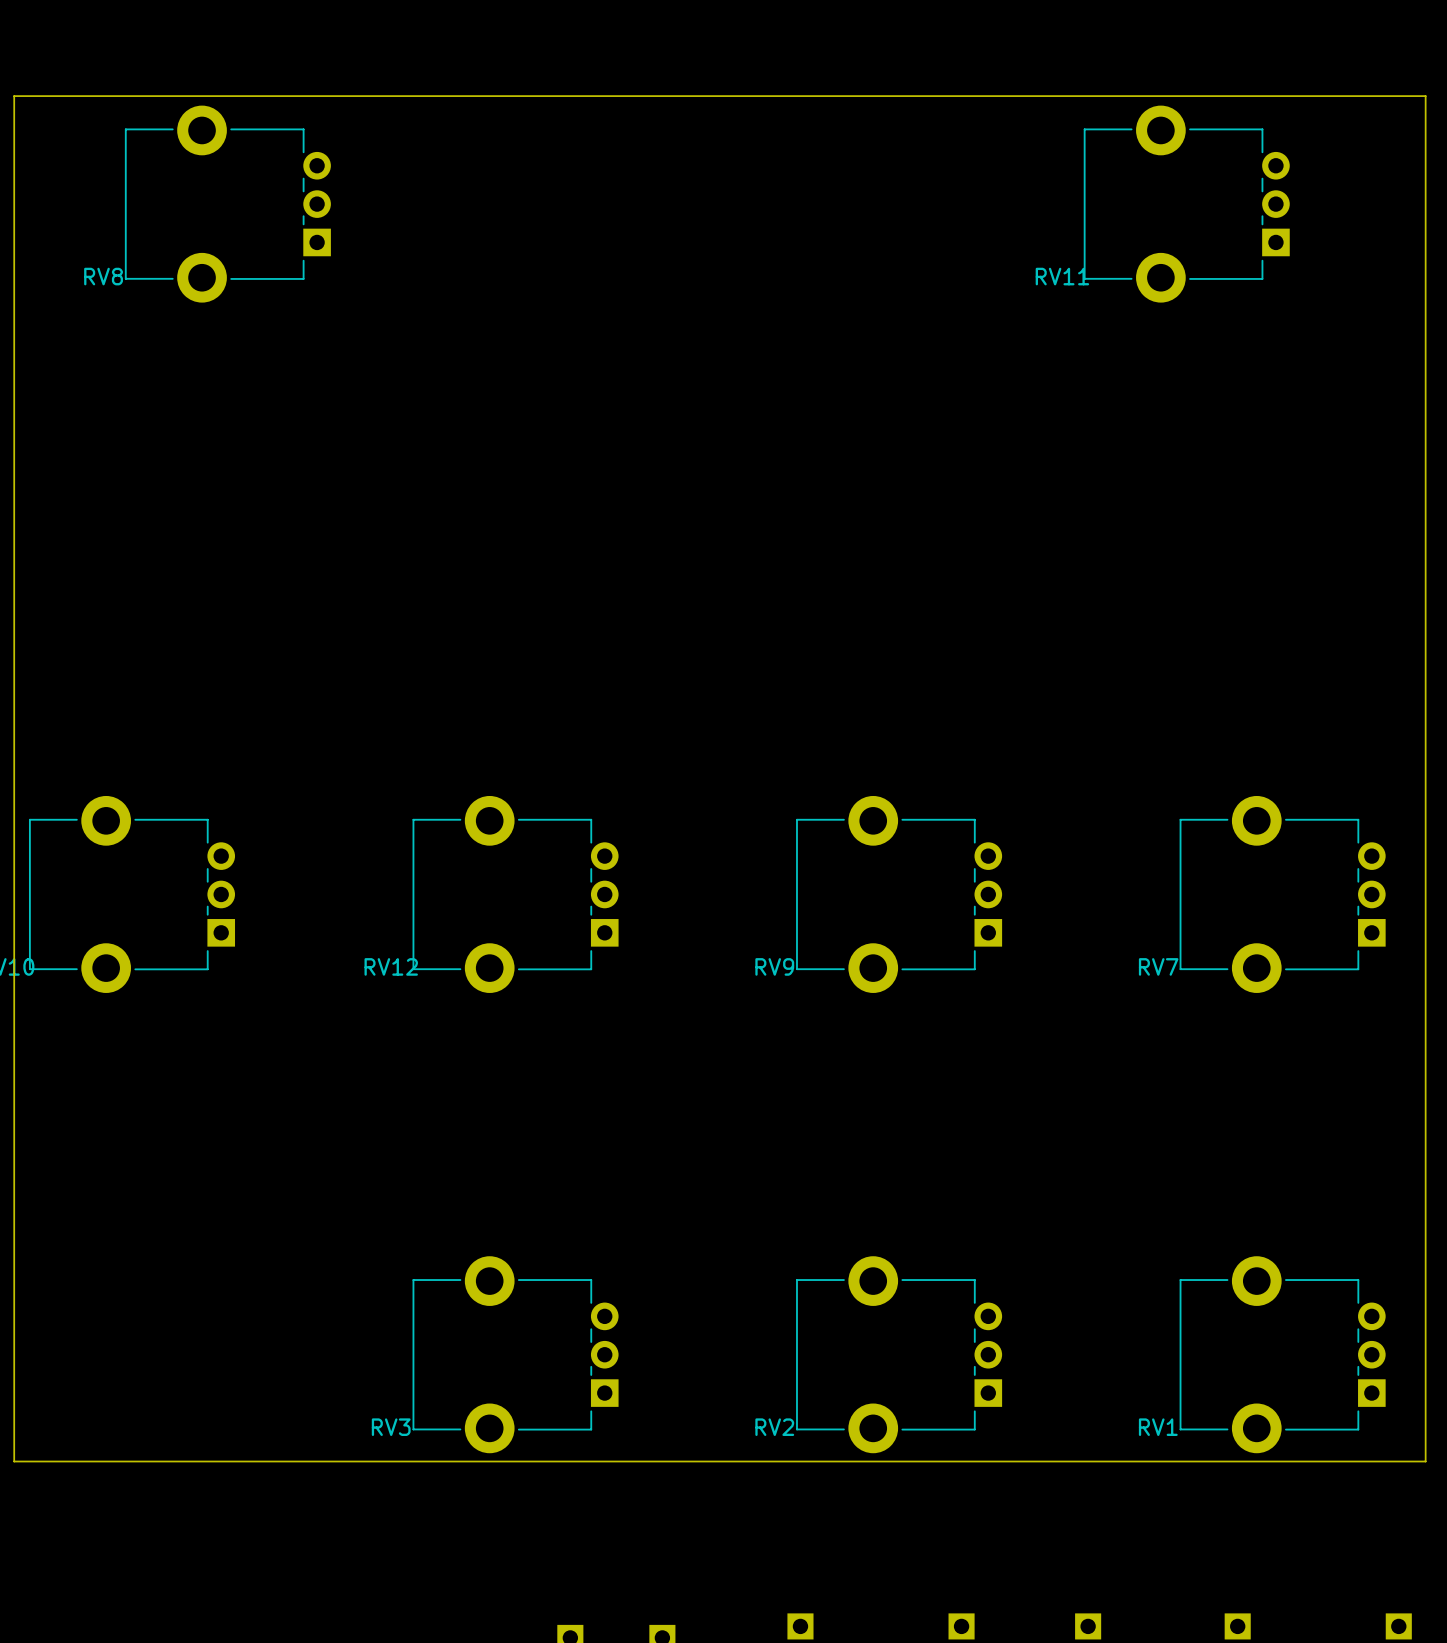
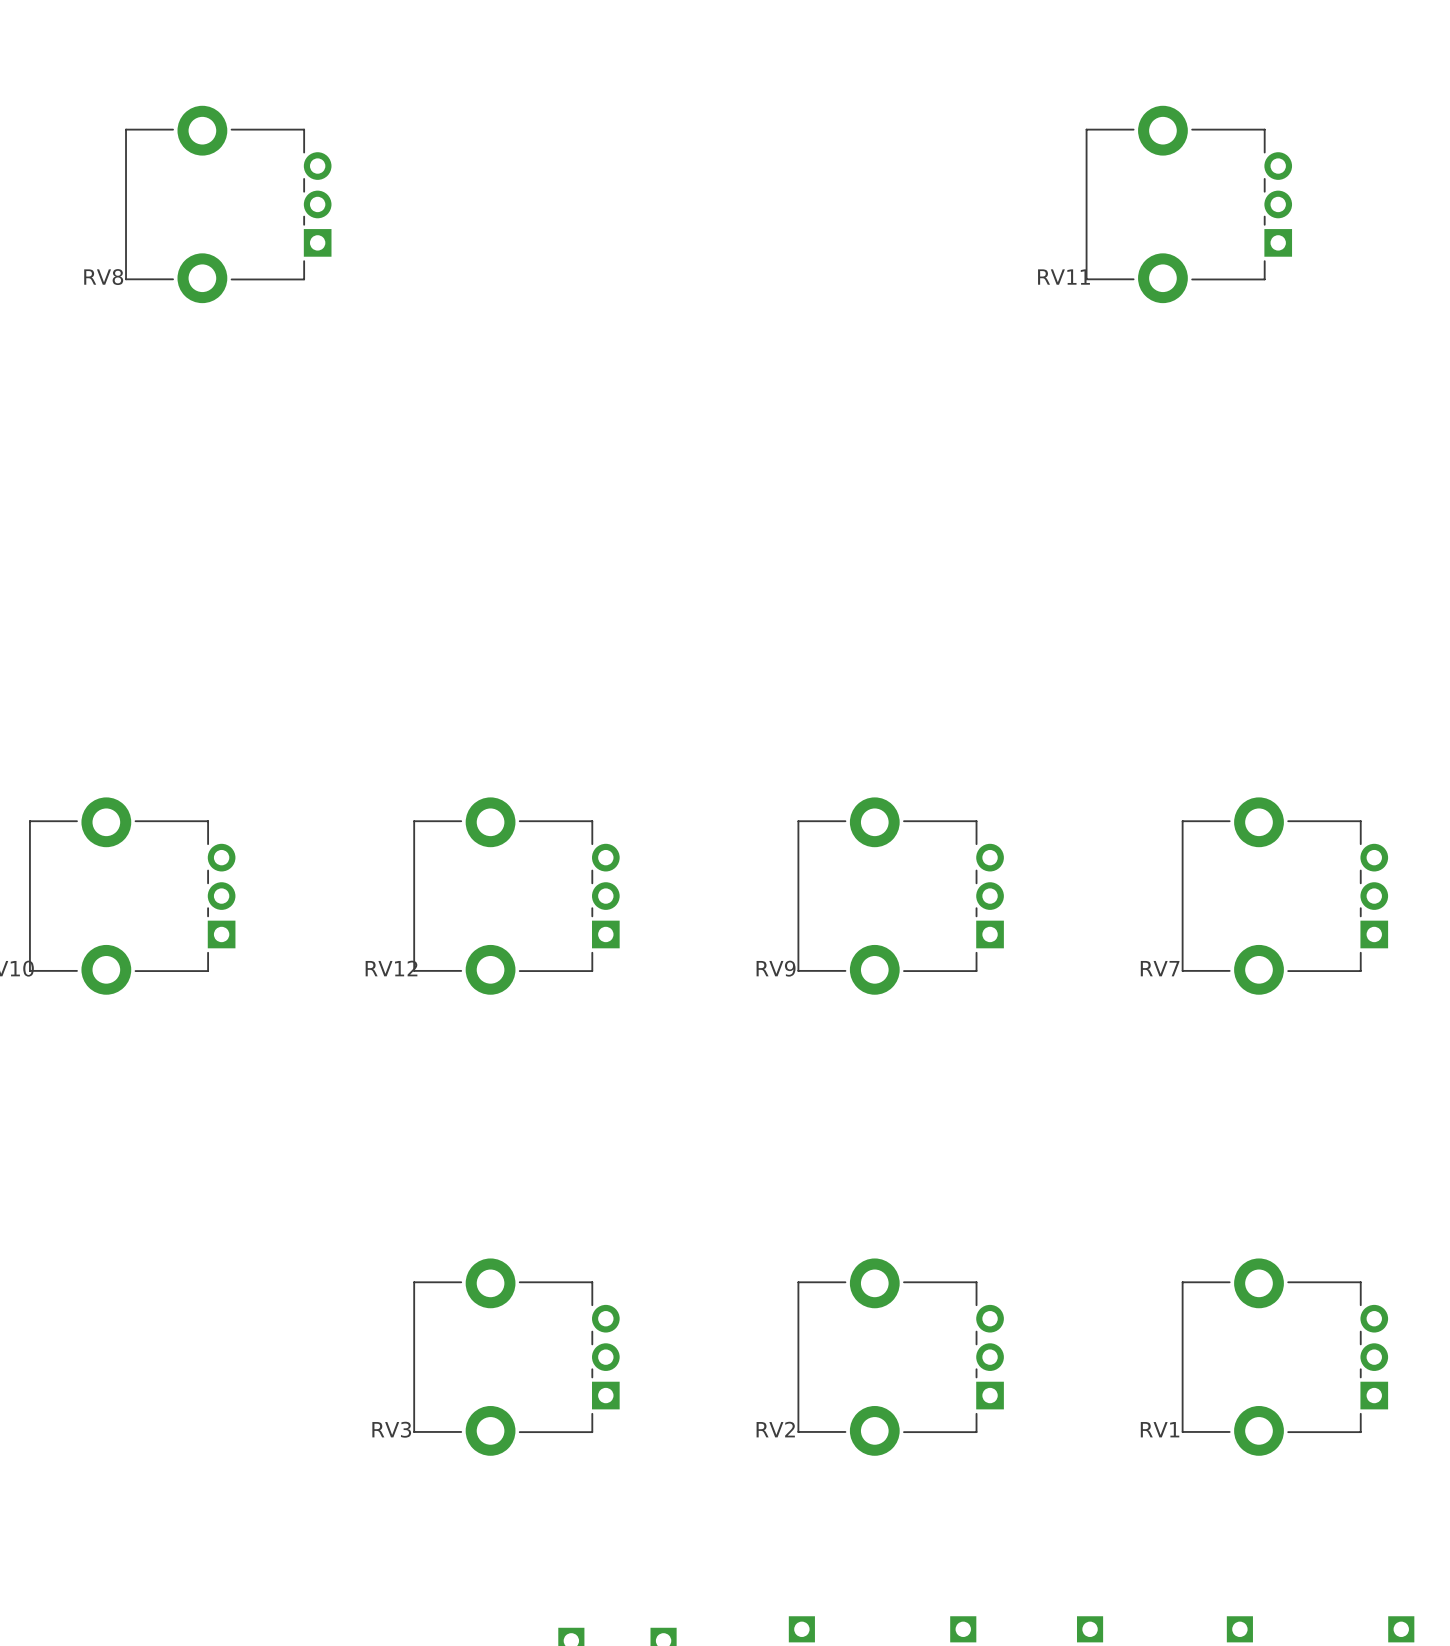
board edge: (1425, 96) (14, 96) (14, 1461) (1425, 1461) (1425, 96) -> none

